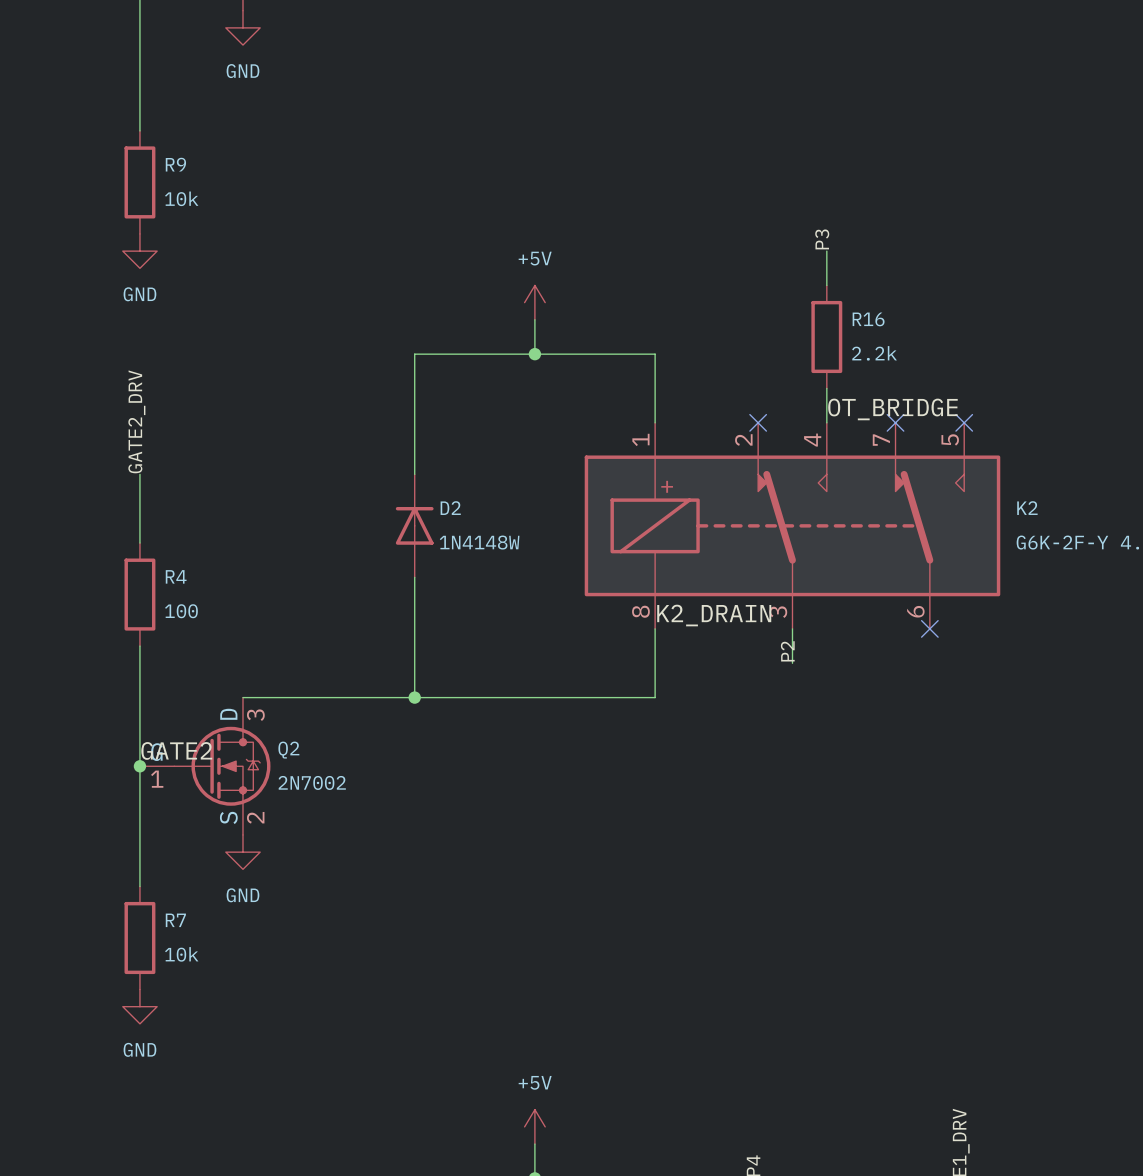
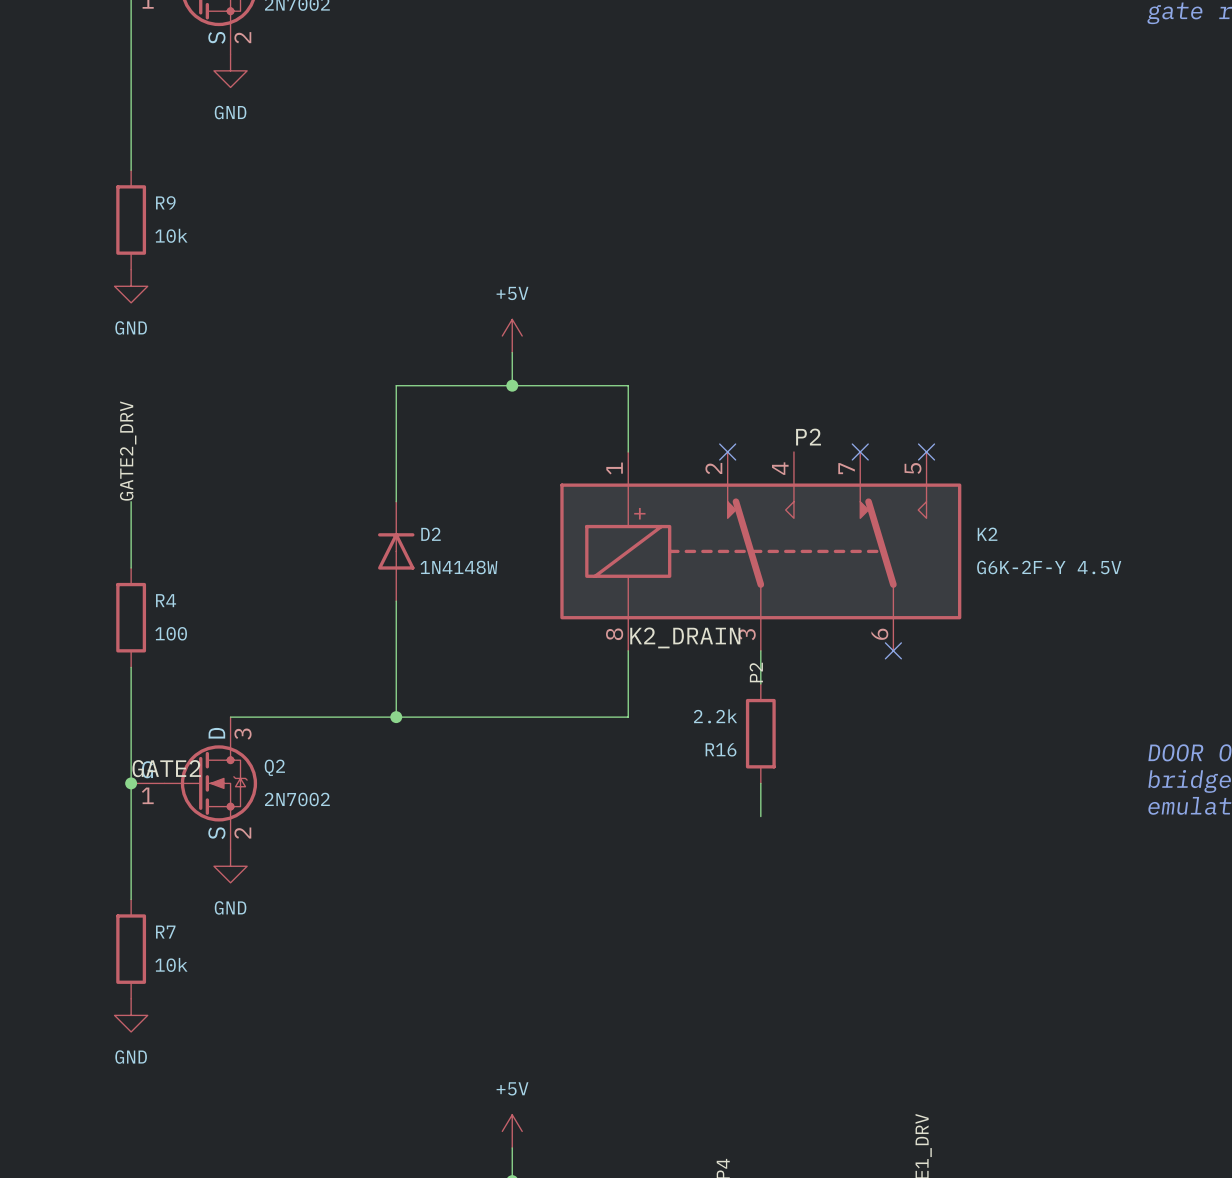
label: P3 (822, 239) -> none
wire: (826, 251) (826, 285) -> none
R16 name position: R16 (868, 319) -> R16 (721, 749)
R16 position: (826, 336) -> (760, 733)
R16 value position: 2.2k (874, 353) -> 2.2k (715, 716)
wire: (826, 388) (826, 422) -> none
label: OT_BRIDGE (892, 409) -> P2 (808, 437)
wire: none -> (760, 783) (760, 816)

